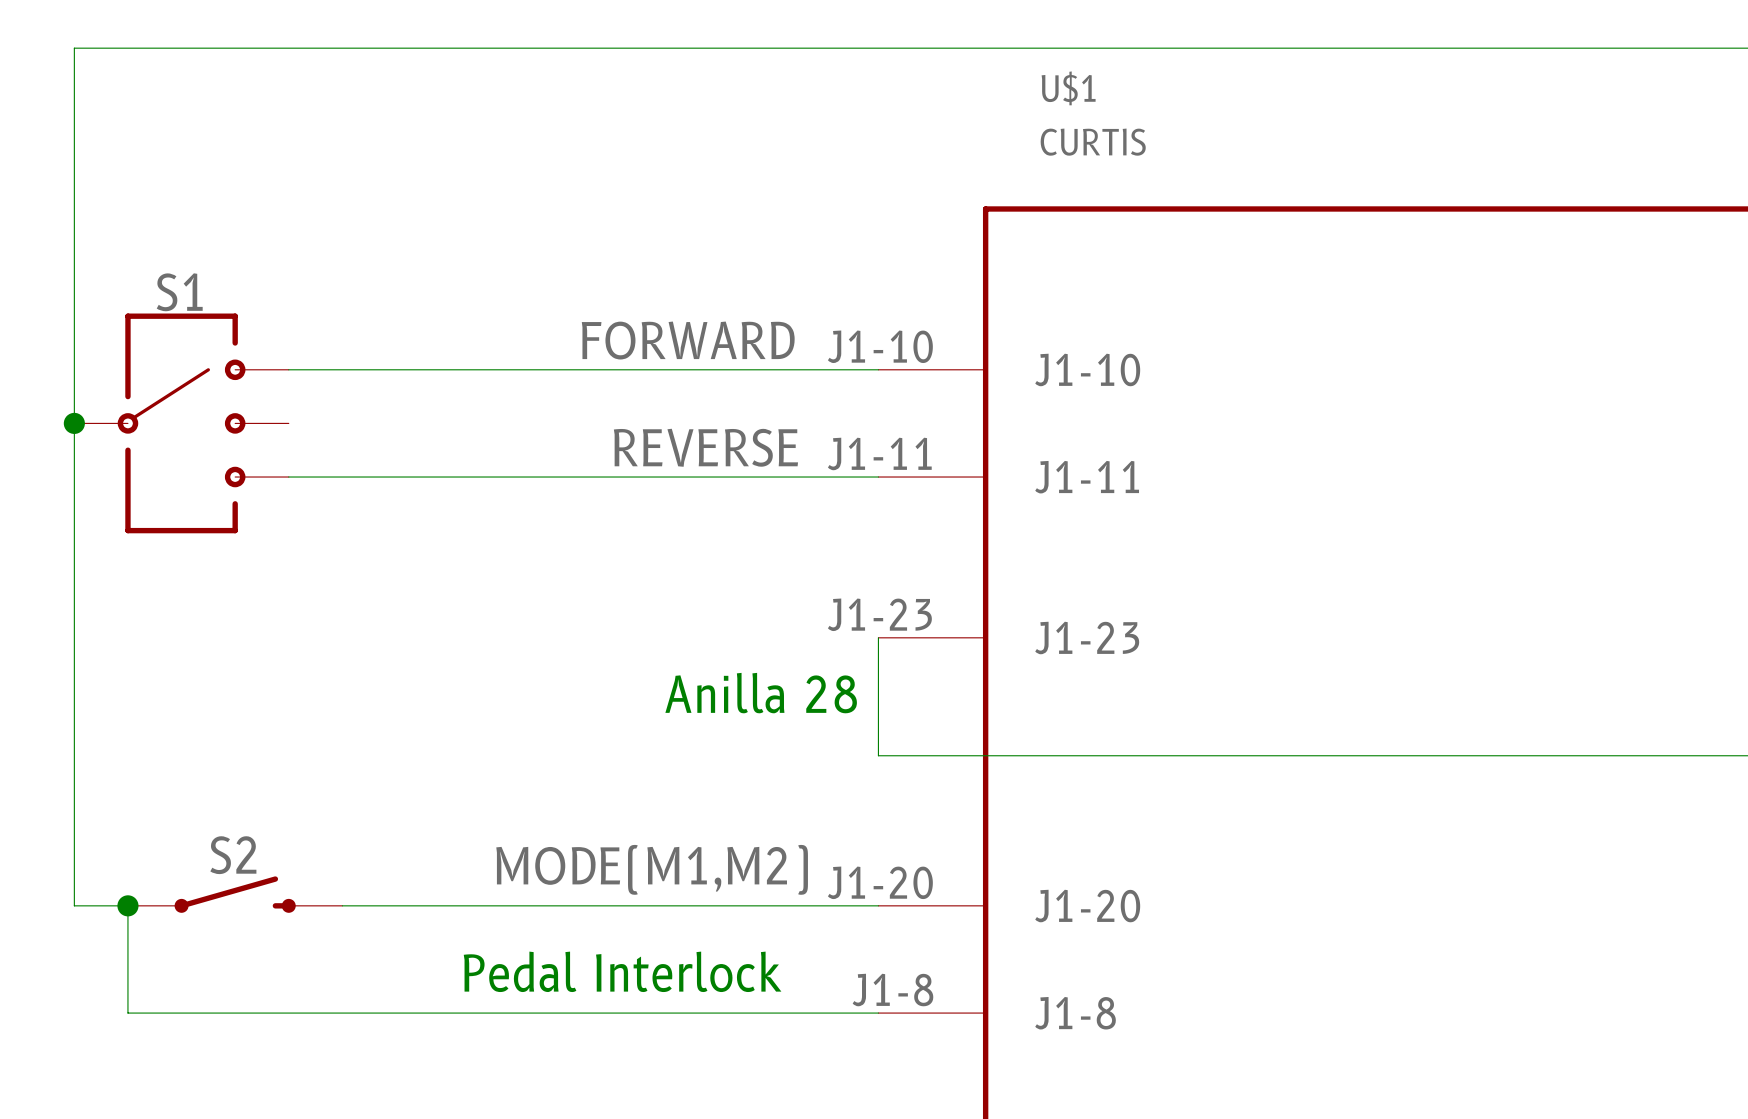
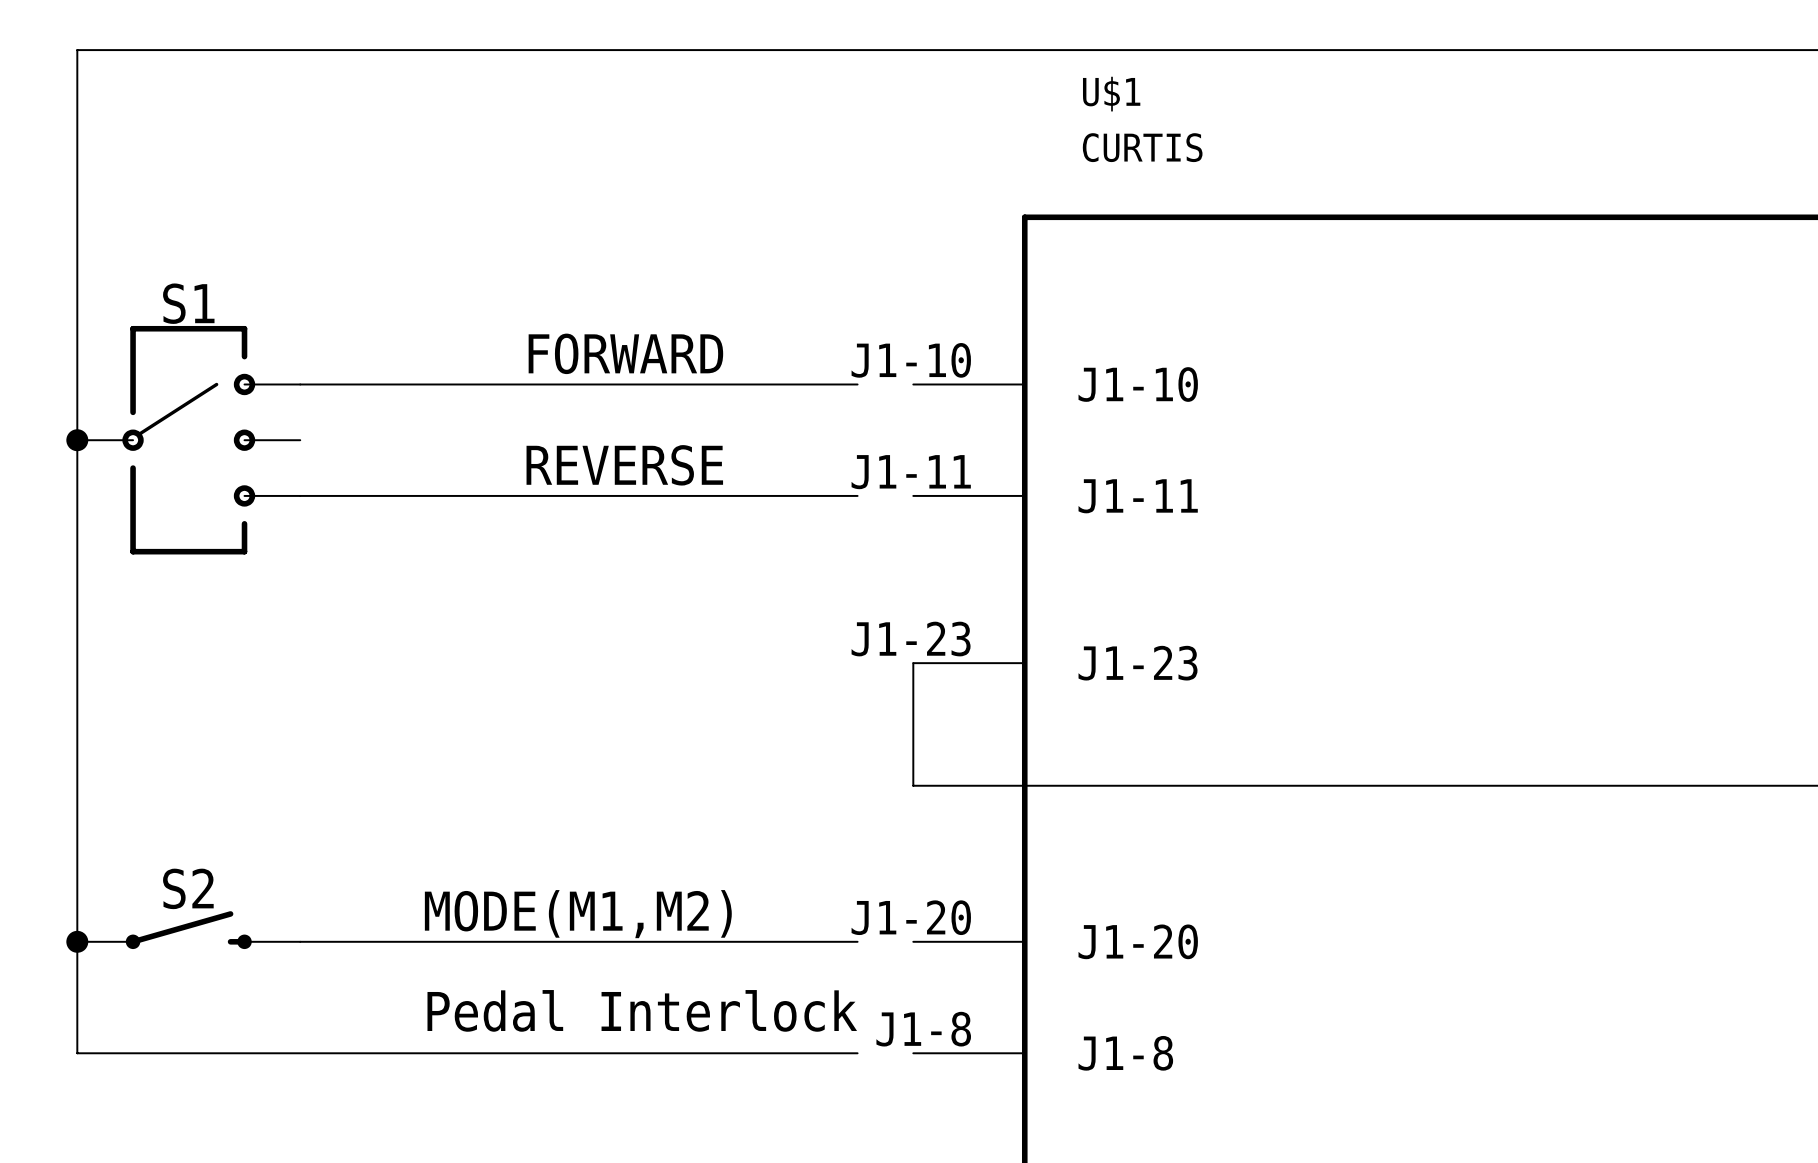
label position: FORWARD (688, 340) -> FORWARD (625, 353)
wire: (824, 369) (878, 369) -> none
label position: REVERSE (705, 447) -> REVERSE (624, 465)
wire: (824, 477) (878, 477) -> none
text: Anilla 28 (761, 693) -> none
label position: MODE(M1,M2) (652, 869) -> MODE(M1,M2) (578, 914)
S2 position: (235, 894) -> (188, 930)
wire: (74, 905) (127, 905) (127, 1013) -> (77, 941) (77, 1053) (133, 1053)
junction position: (127, 905) -> (77, 941)
wire: (824, 905) (878, 905) -> none
text position: Pedal Interlock (622, 971) -> Pedal Interlock (642, 1010)
wire: (824, 1013) (878, 1013) -> none

